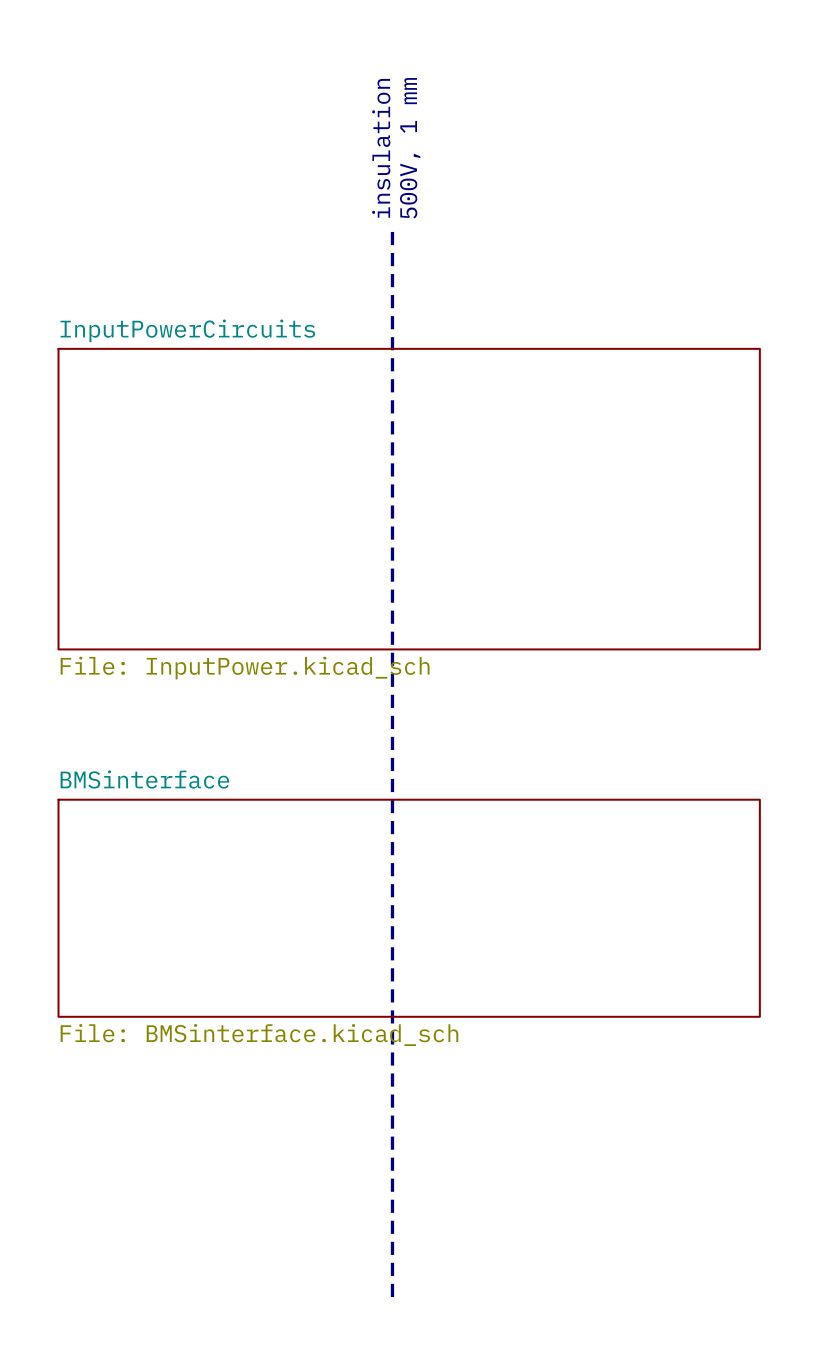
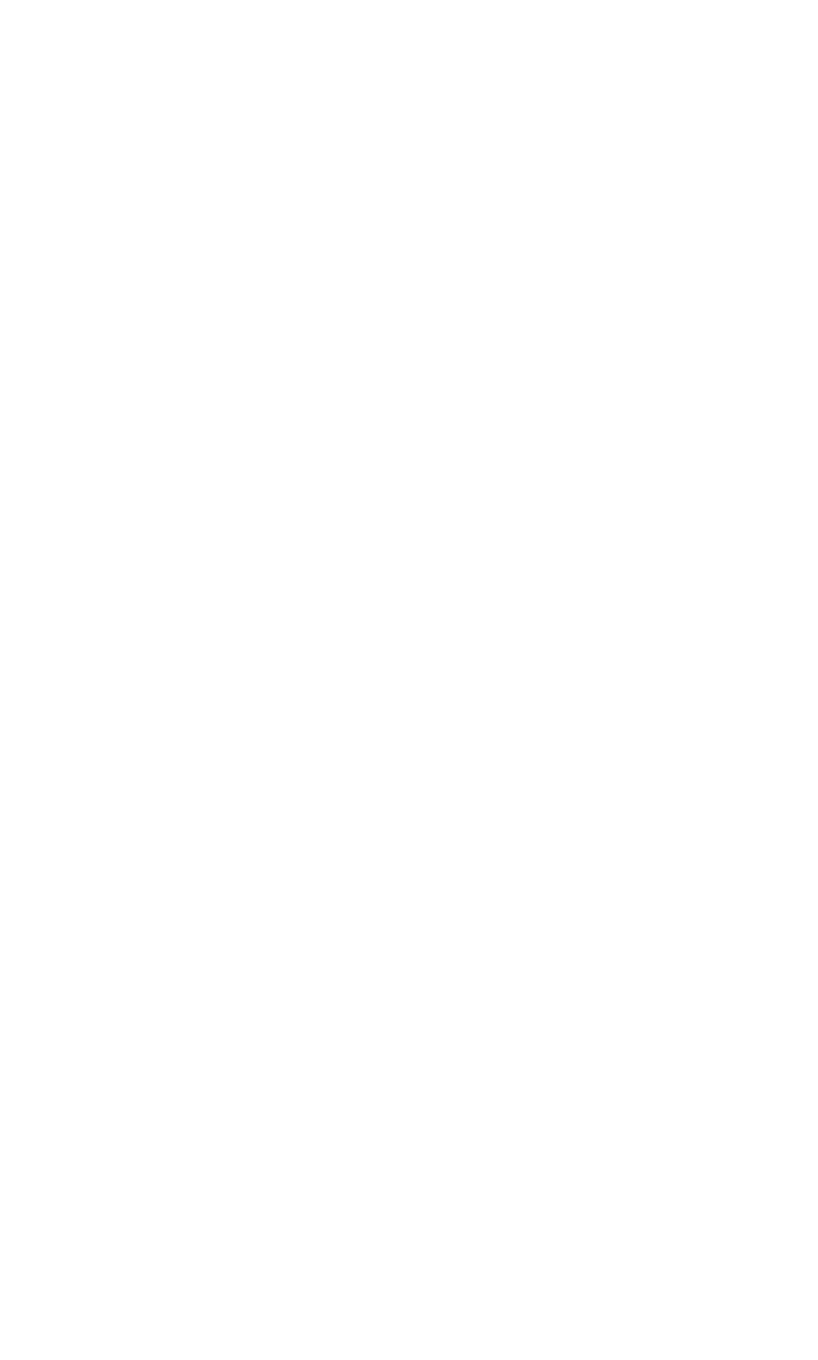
text: insulation (381, 148) -> none
text: 500V, 1 mm (410, 148) -> none
line: (392, 231) (392, 1300) -> none
sheet InputPowerCircuits: File: InputPower.kicad_sch (409, 499) -> none
sheet BMSinterface: File: BMSinterface.kicad_sch (409, 908) -> none

